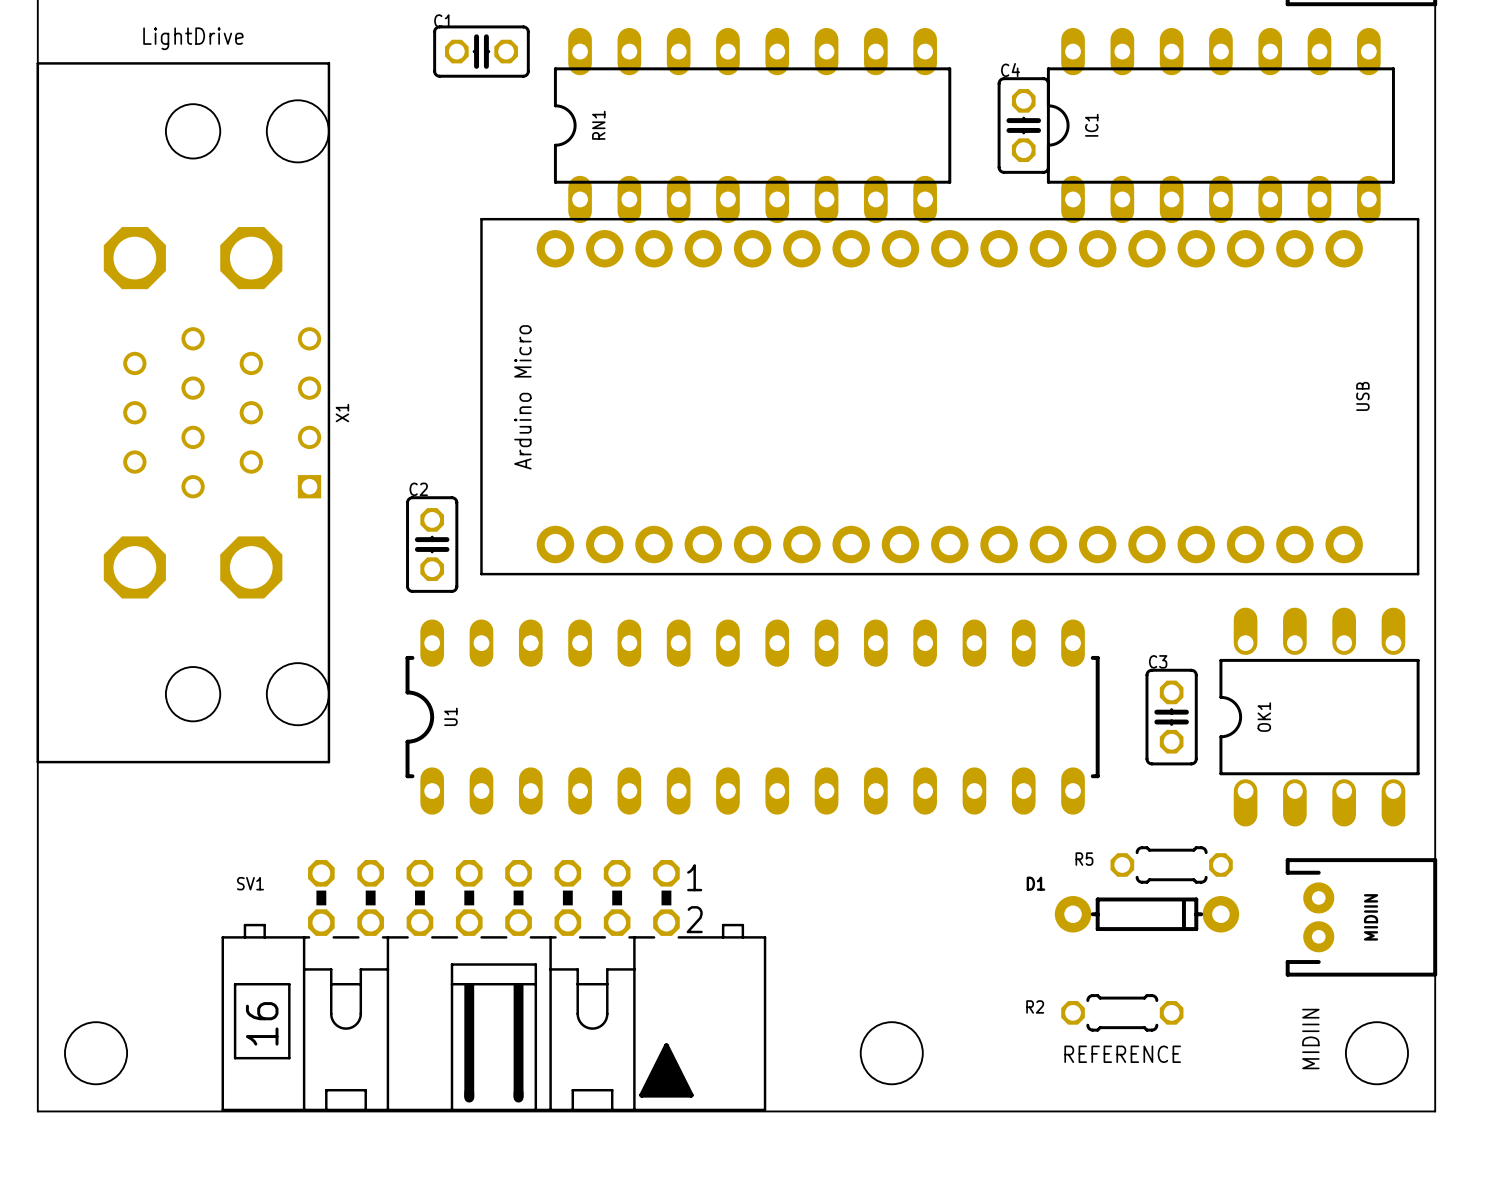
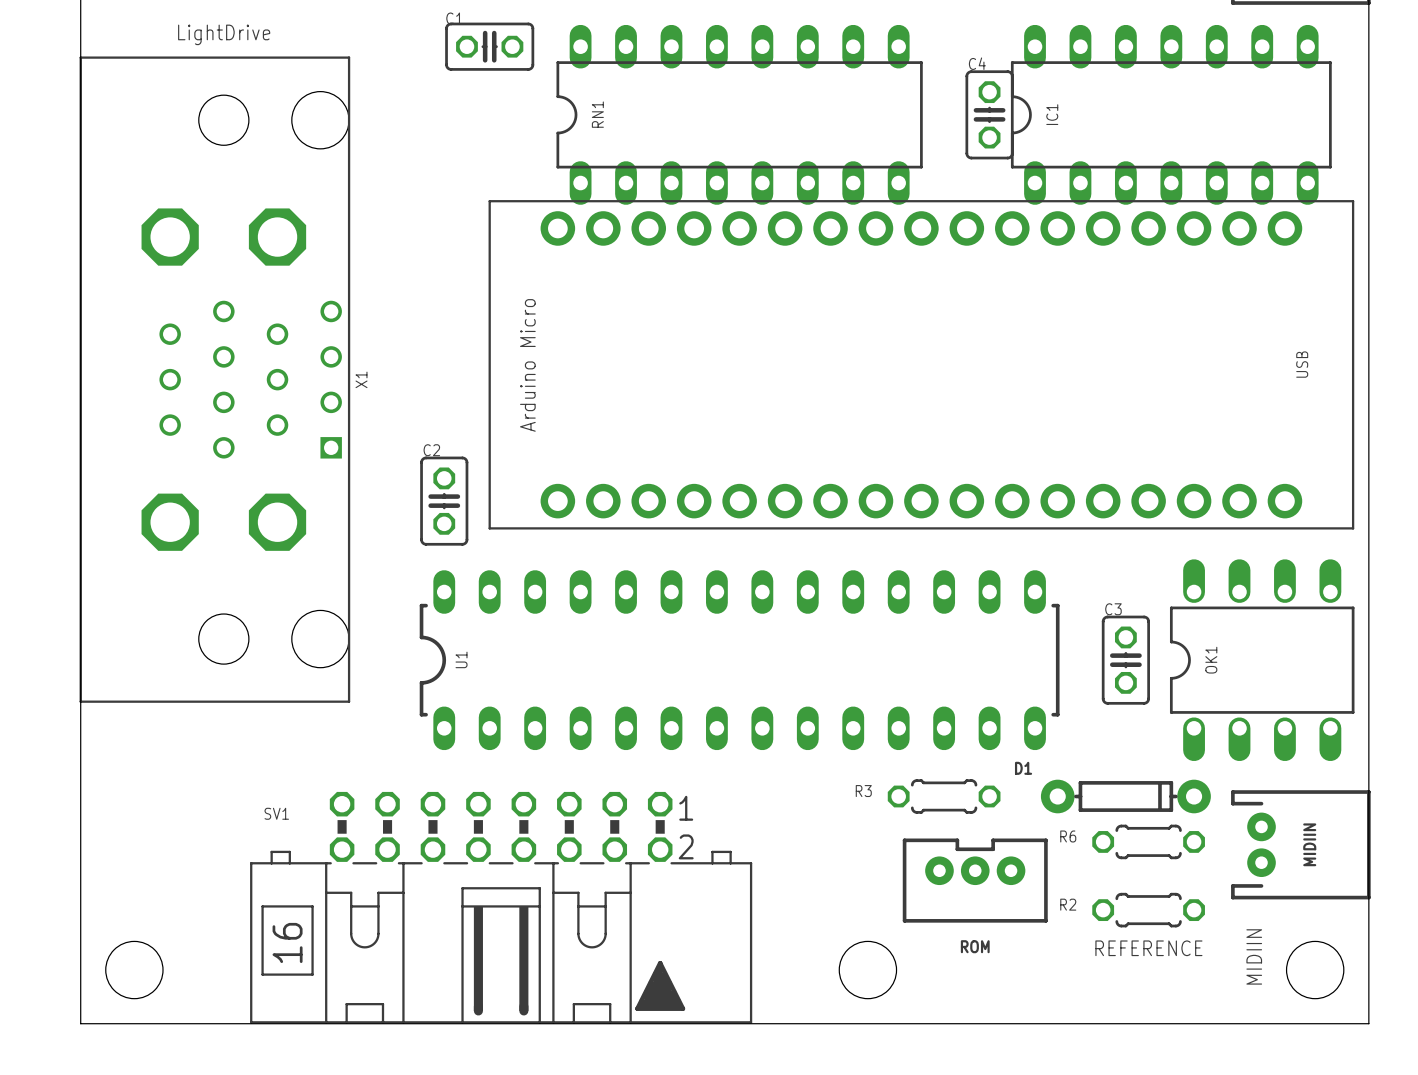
R3: none -> (944, 796)
R5: (1171, 864) -> none
D1 position: (1146, 914) -> (1125, 796)
R6: none -> (1148, 841)
ROM: none -> (975, 880)
R2 position: (1122, 1012) -> (1148, 910)
text position: REFERENCE (1122, 1054) -> REFERENCE (1148, 948)

